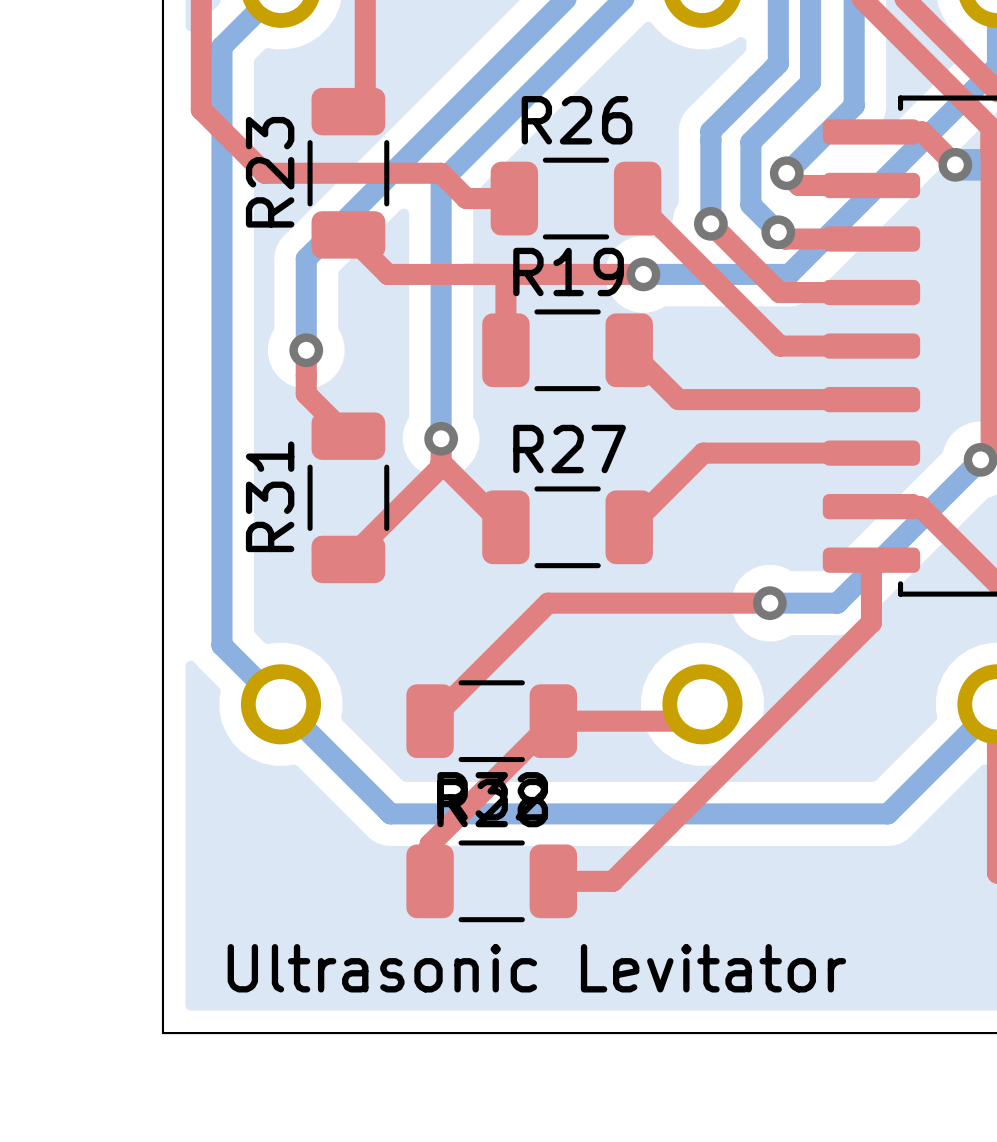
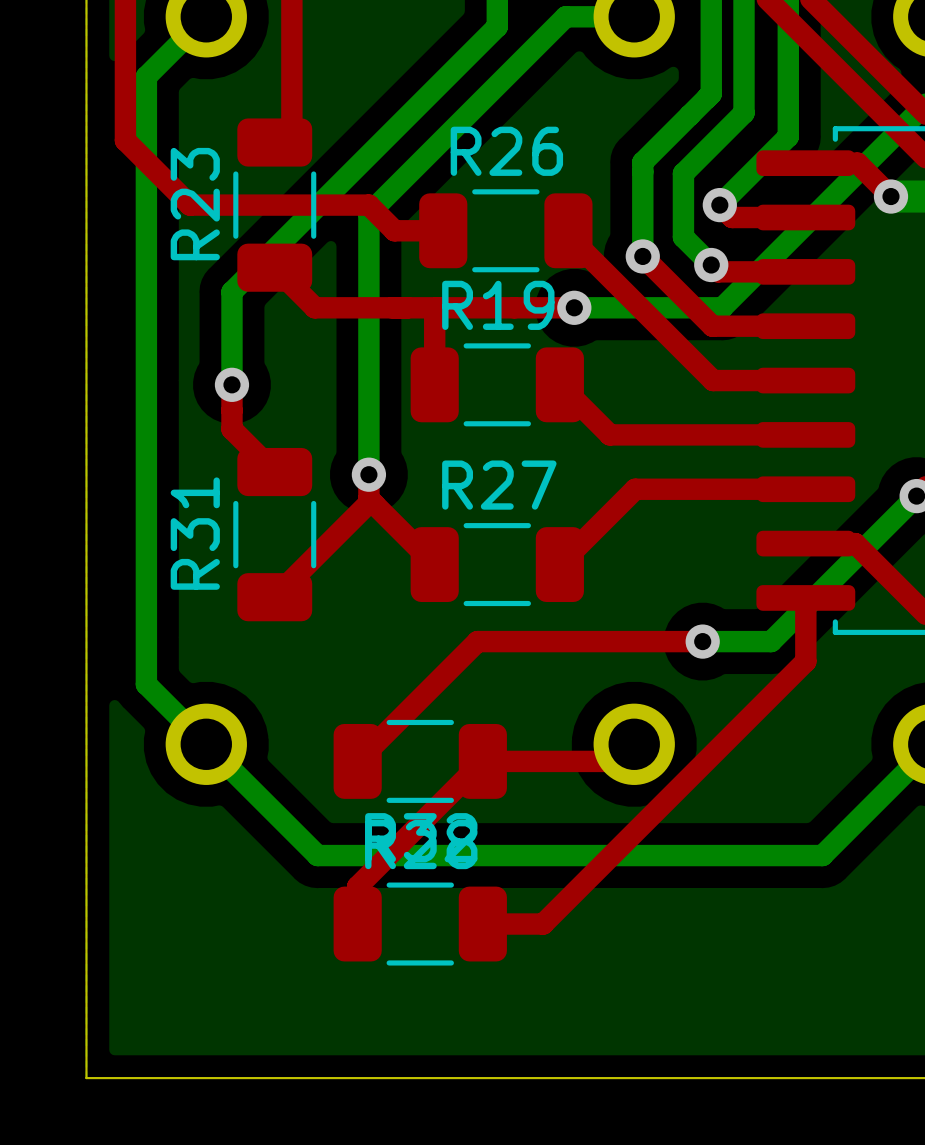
text: Ultrasonic Levitator (536, 968) -> none

